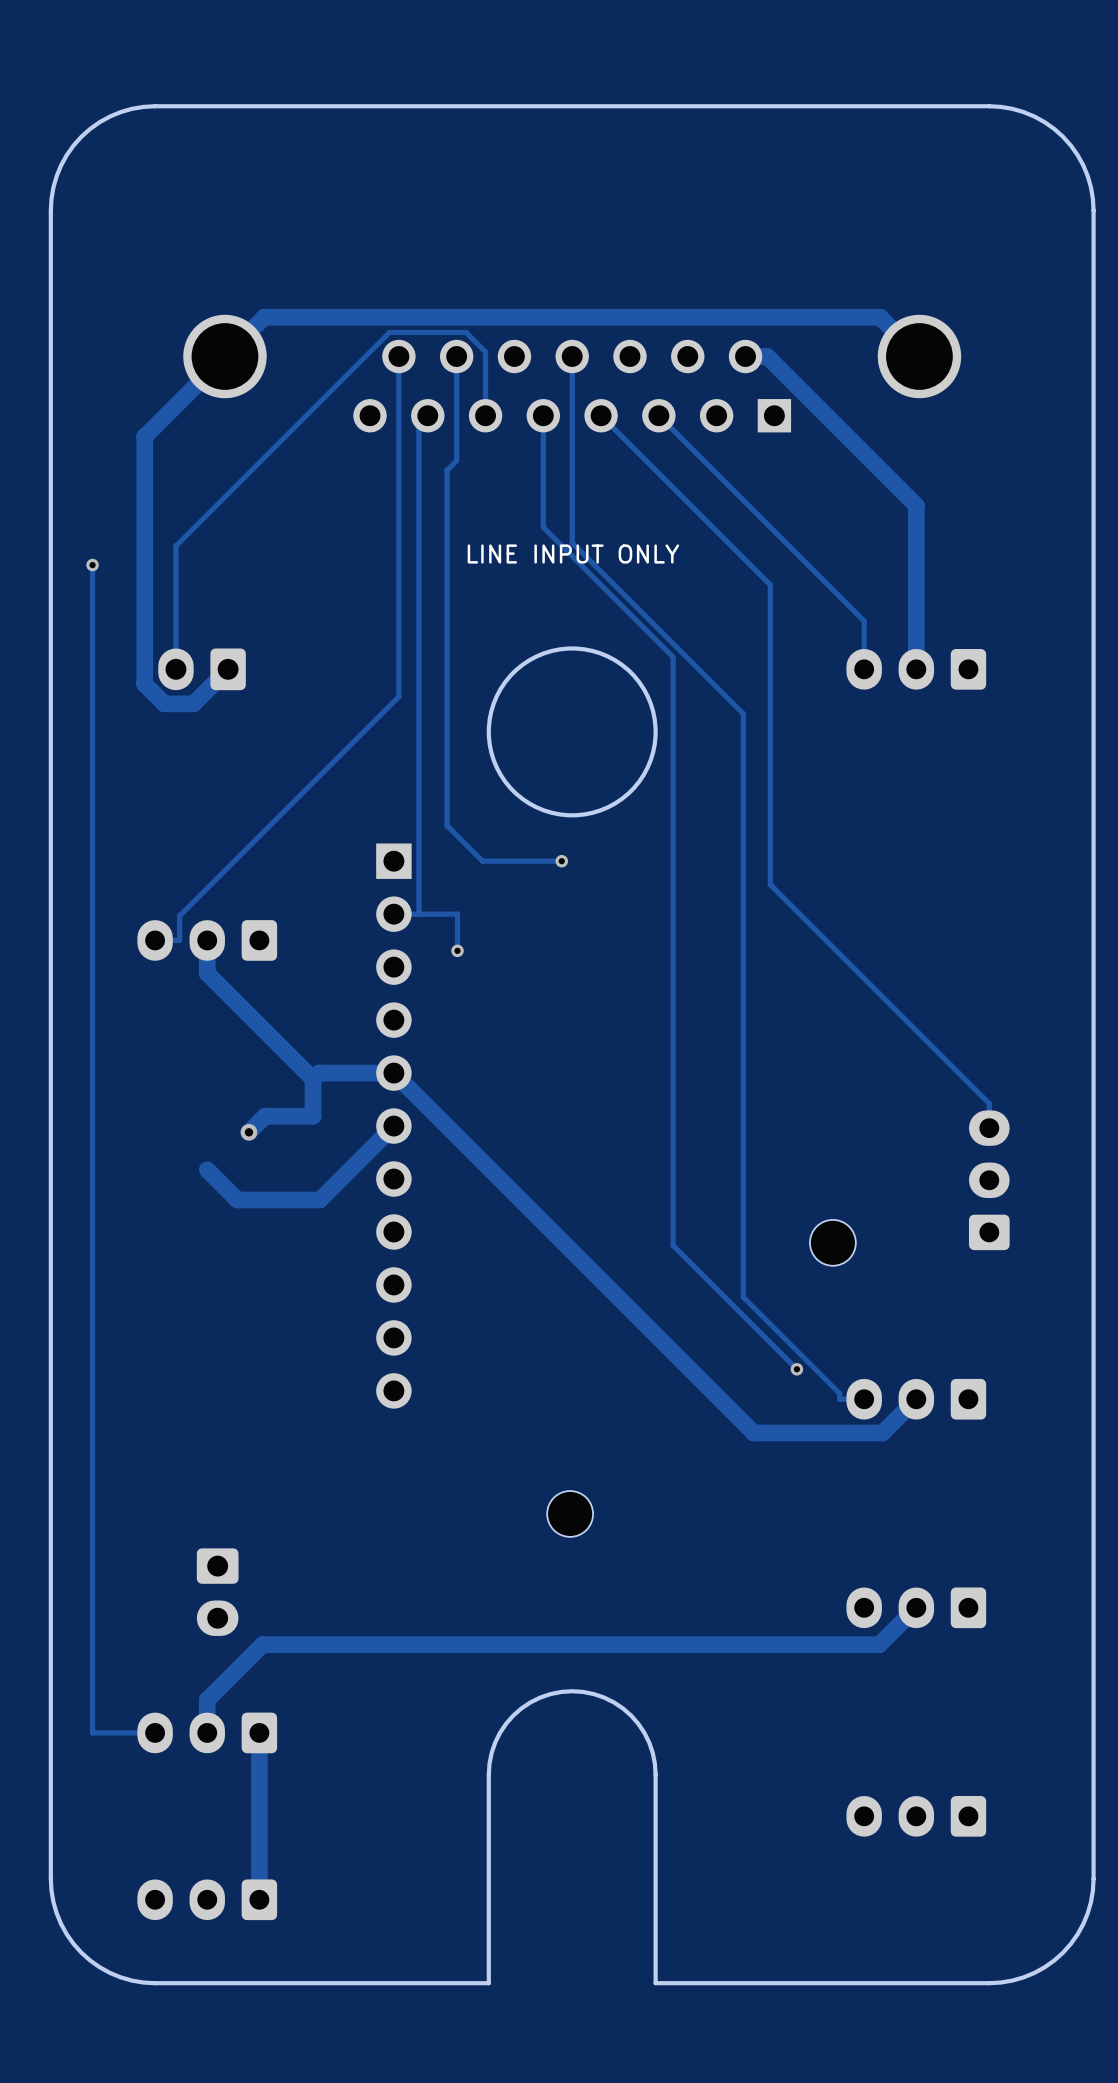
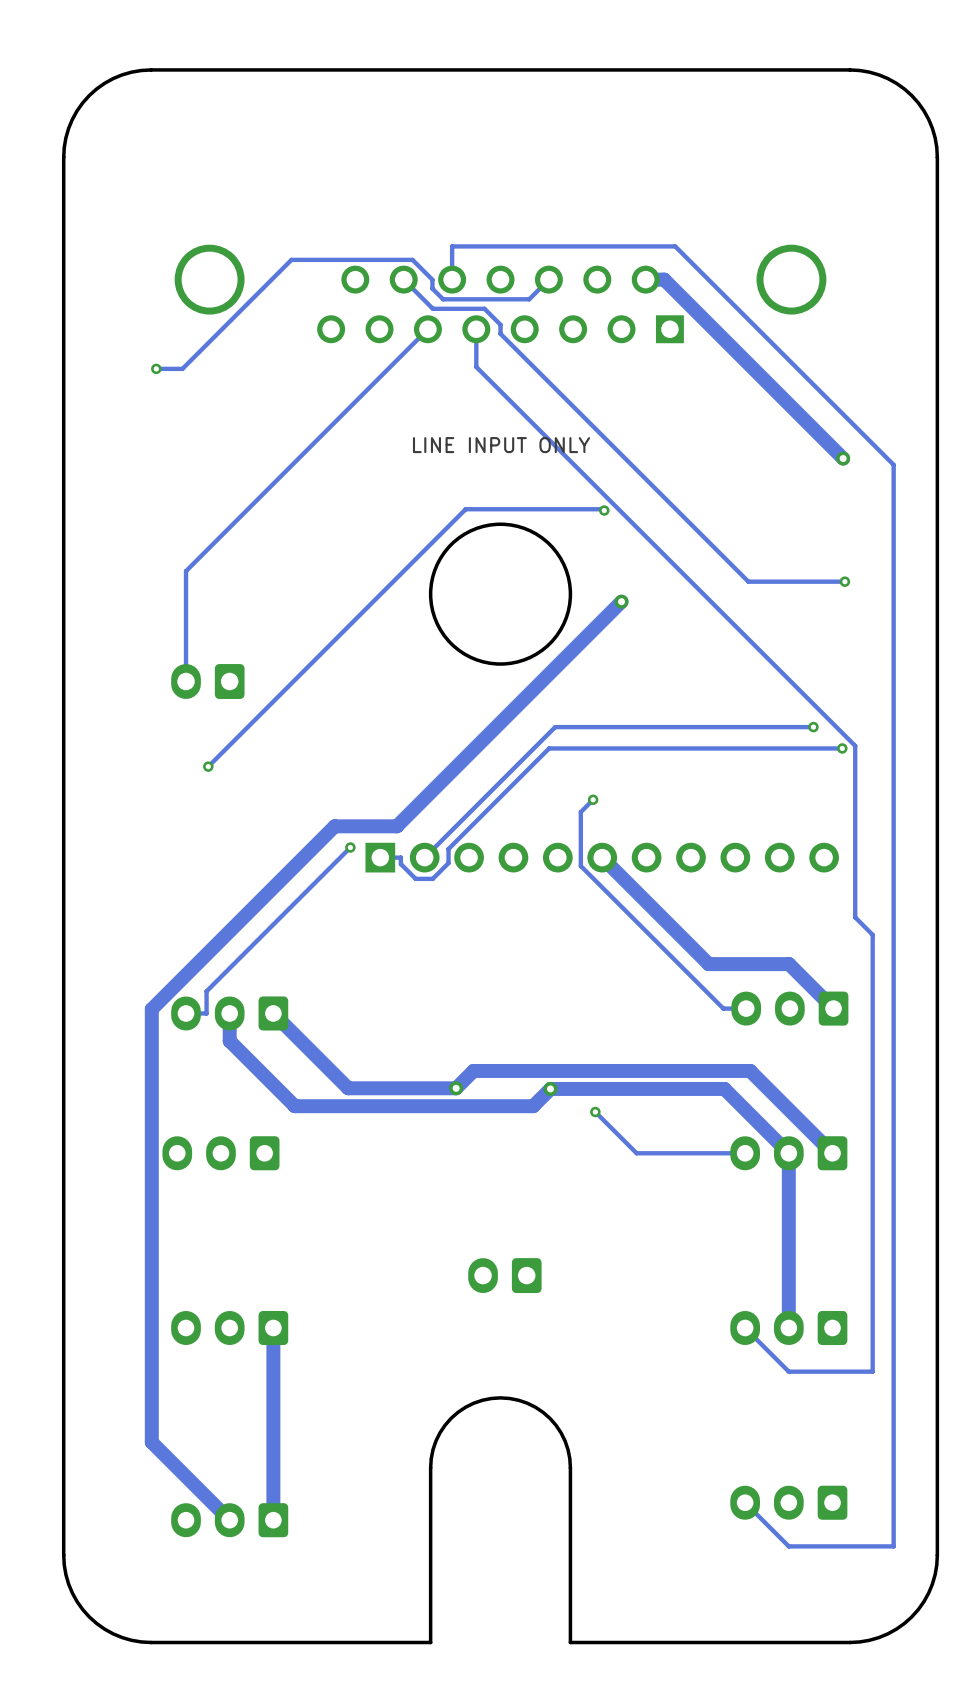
track: (398, 356) (398, 696) (179, 915) (179, 940) (155, 940) -> none
track: (456, 356) (456, 460) (447, 470) (447, 825) (482, 861) (561, 861) -> none
track: none -> (452, 279) (452, 246) (675, 246) (893, 464) (893, 1546) (788, 1546) (745, 1502)
track: (572, 356) (572, 410) -> (403, 279) (432, 308) (484, 308) (500, 324)
track: none -> (548, 279) (529, 299) (443, 299) (432, 288) (432, 279) (412, 259) (291, 259) (182, 368) (156, 368)
track: (767, 356) (916, 505) (916, 669) -> (664, 279) (843, 458)
track: (919, 356) (880, 317) (264, 317) (144, 436) (144, 684) (164, 703) (193, 703) (228, 669) -> none
track: (427, 415) (418, 424) (418, 914) -> none
track: (485, 415) (485, 351) (466, 332) (389, 332) (175, 545) (175, 669) -> (427, 329) (186, 571) (186, 681)
track: (601, 415) (770, 584) (770, 884) (989, 1103) (989, 1128) -> none
track: (658, 415) (864, 621) (864, 669) -> none
track: (572, 421) (572, 542) (743, 713) (743, 1297) (839, 1393) (839, 1399) -> (500, 333) (748, 581) (844, 581)
track: (543, 460) (543, 527) (673, 657) (673, 1245) (796, 1369) -> (476, 366) (855, 745) (855, 917) (872, 934) (872, 1371) (788, 1371) (745, 1327)
track: (92, 565) (92, 1732) (155, 1732) -> none
via position: (92, 565) -> (156, 368)
via: none -> (843, 458)
track: none -> (604, 510) (465, 509) (208, 766)
via: none -> (604, 510)
part position: (202, 669) -> (207, 681)
part: (916, 669) -> none
via: none -> (844, 581)
track: none -> (621, 601) (396, 826) (334, 826) (151, 1009) (151, 1442) (229, 1520)
via: none -> (621, 601)
via: (561, 861) -> none
track: none -> (813, 727) (555, 727) (424, 857)
via: none -> (813, 727)
track: (393, 914) (457, 914) (457, 950) -> none
track: none -> (842, 748) (549, 748) (448, 849) (448, 863) (432, 878) (415, 878) (400, 864) (400, 857) (380, 857)
via: none -> (842, 748)
via: none -> (208, 766)
track: (207, 940) (207, 973) (313, 1079) -> none
part: (207, 940) -> none
via position: (457, 950) -> (350, 847)
track: none -> (593, 799) (580, 812) (580, 866) (723, 1008) (746, 1008)
via: none -> (593, 799)
track: none -> (350, 847) (206, 991) (206, 1013) (186, 1013)
track: none -> (602, 857) (708, 964) (789, 964) (833, 1008)
track: (313, 1079) (313, 1116) (265, 1116) (248, 1132) -> none
track: (313, 1079) (319, 1073) (393, 1073) (753, 1432) (882, 1432) (916, 1399) -> none
track: (393, 1126) (319, 1199) (237, 1199) (207, 1169) -> none
part rotation: 0° (393, 1126) -> 90° counterclockwise (602, 857)
via: (248, 1132) -> none
part rotation: 0° (989, 1180) -> 90° counterclockwise (789, 1008)
part position: (989, 1180) -> (789, 1008)
part: none -> (229, 1013)
track: none -> (273, 1013) (348, 1088) (456, 1088) (473, 1070) (750, 1070) (832, 1153)
part: (832, 1242) -> none
via: none -> (456, 1088)
via: none -> (550, 1088)
track: none -> (595, 1112) (636, 1153) (724, 1153)
via position: (796, 1369) -> (595, 1112)
part: none -> (220, 1153)
part: (570, 1513) -> none
part rotation: 0° (217, 1592) -> 90° clockwise (504, 1275)
part position: (217, 1592) -> (504, 1275)
part: none -> (229, 1327)
track: none -> (273, 1327) (273, 1520)
track: (916, 1607) (879, 1644) (262, 1644) (207, 1700) (207, 1732) -> (788, 1327) (788, 1153) (724, 1088) (550, 1088) (533, 1106) (294, 1106) (229, 1041) (229, 1013)
part: (207, 1732) -> none
track: (259, 1732) (259, 1899) -> none
part: none -> (229, 1520)
part: (207, 1899) -> none

